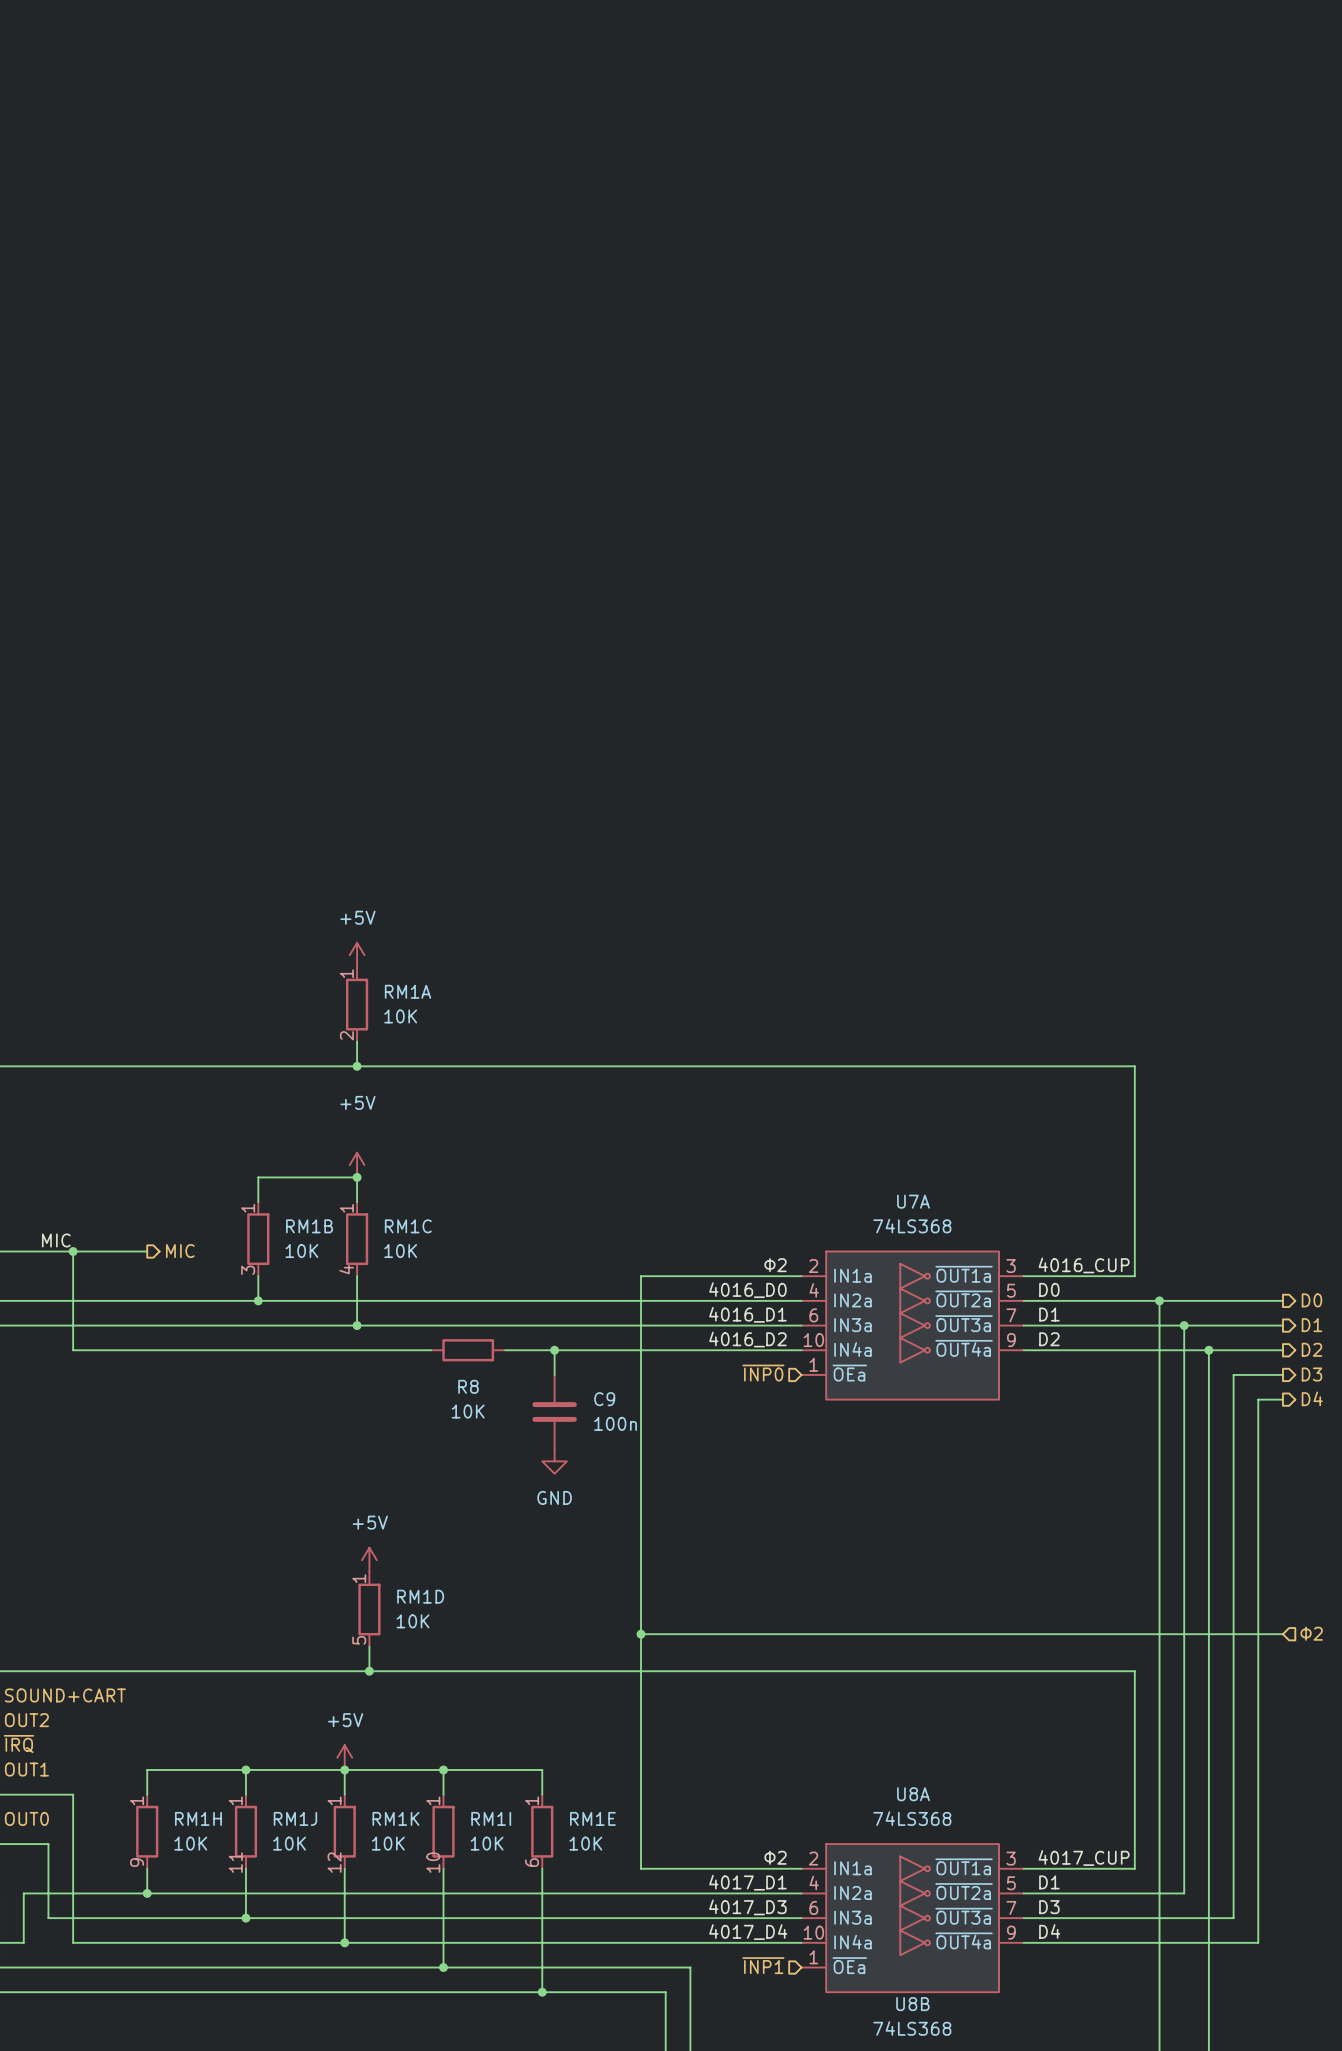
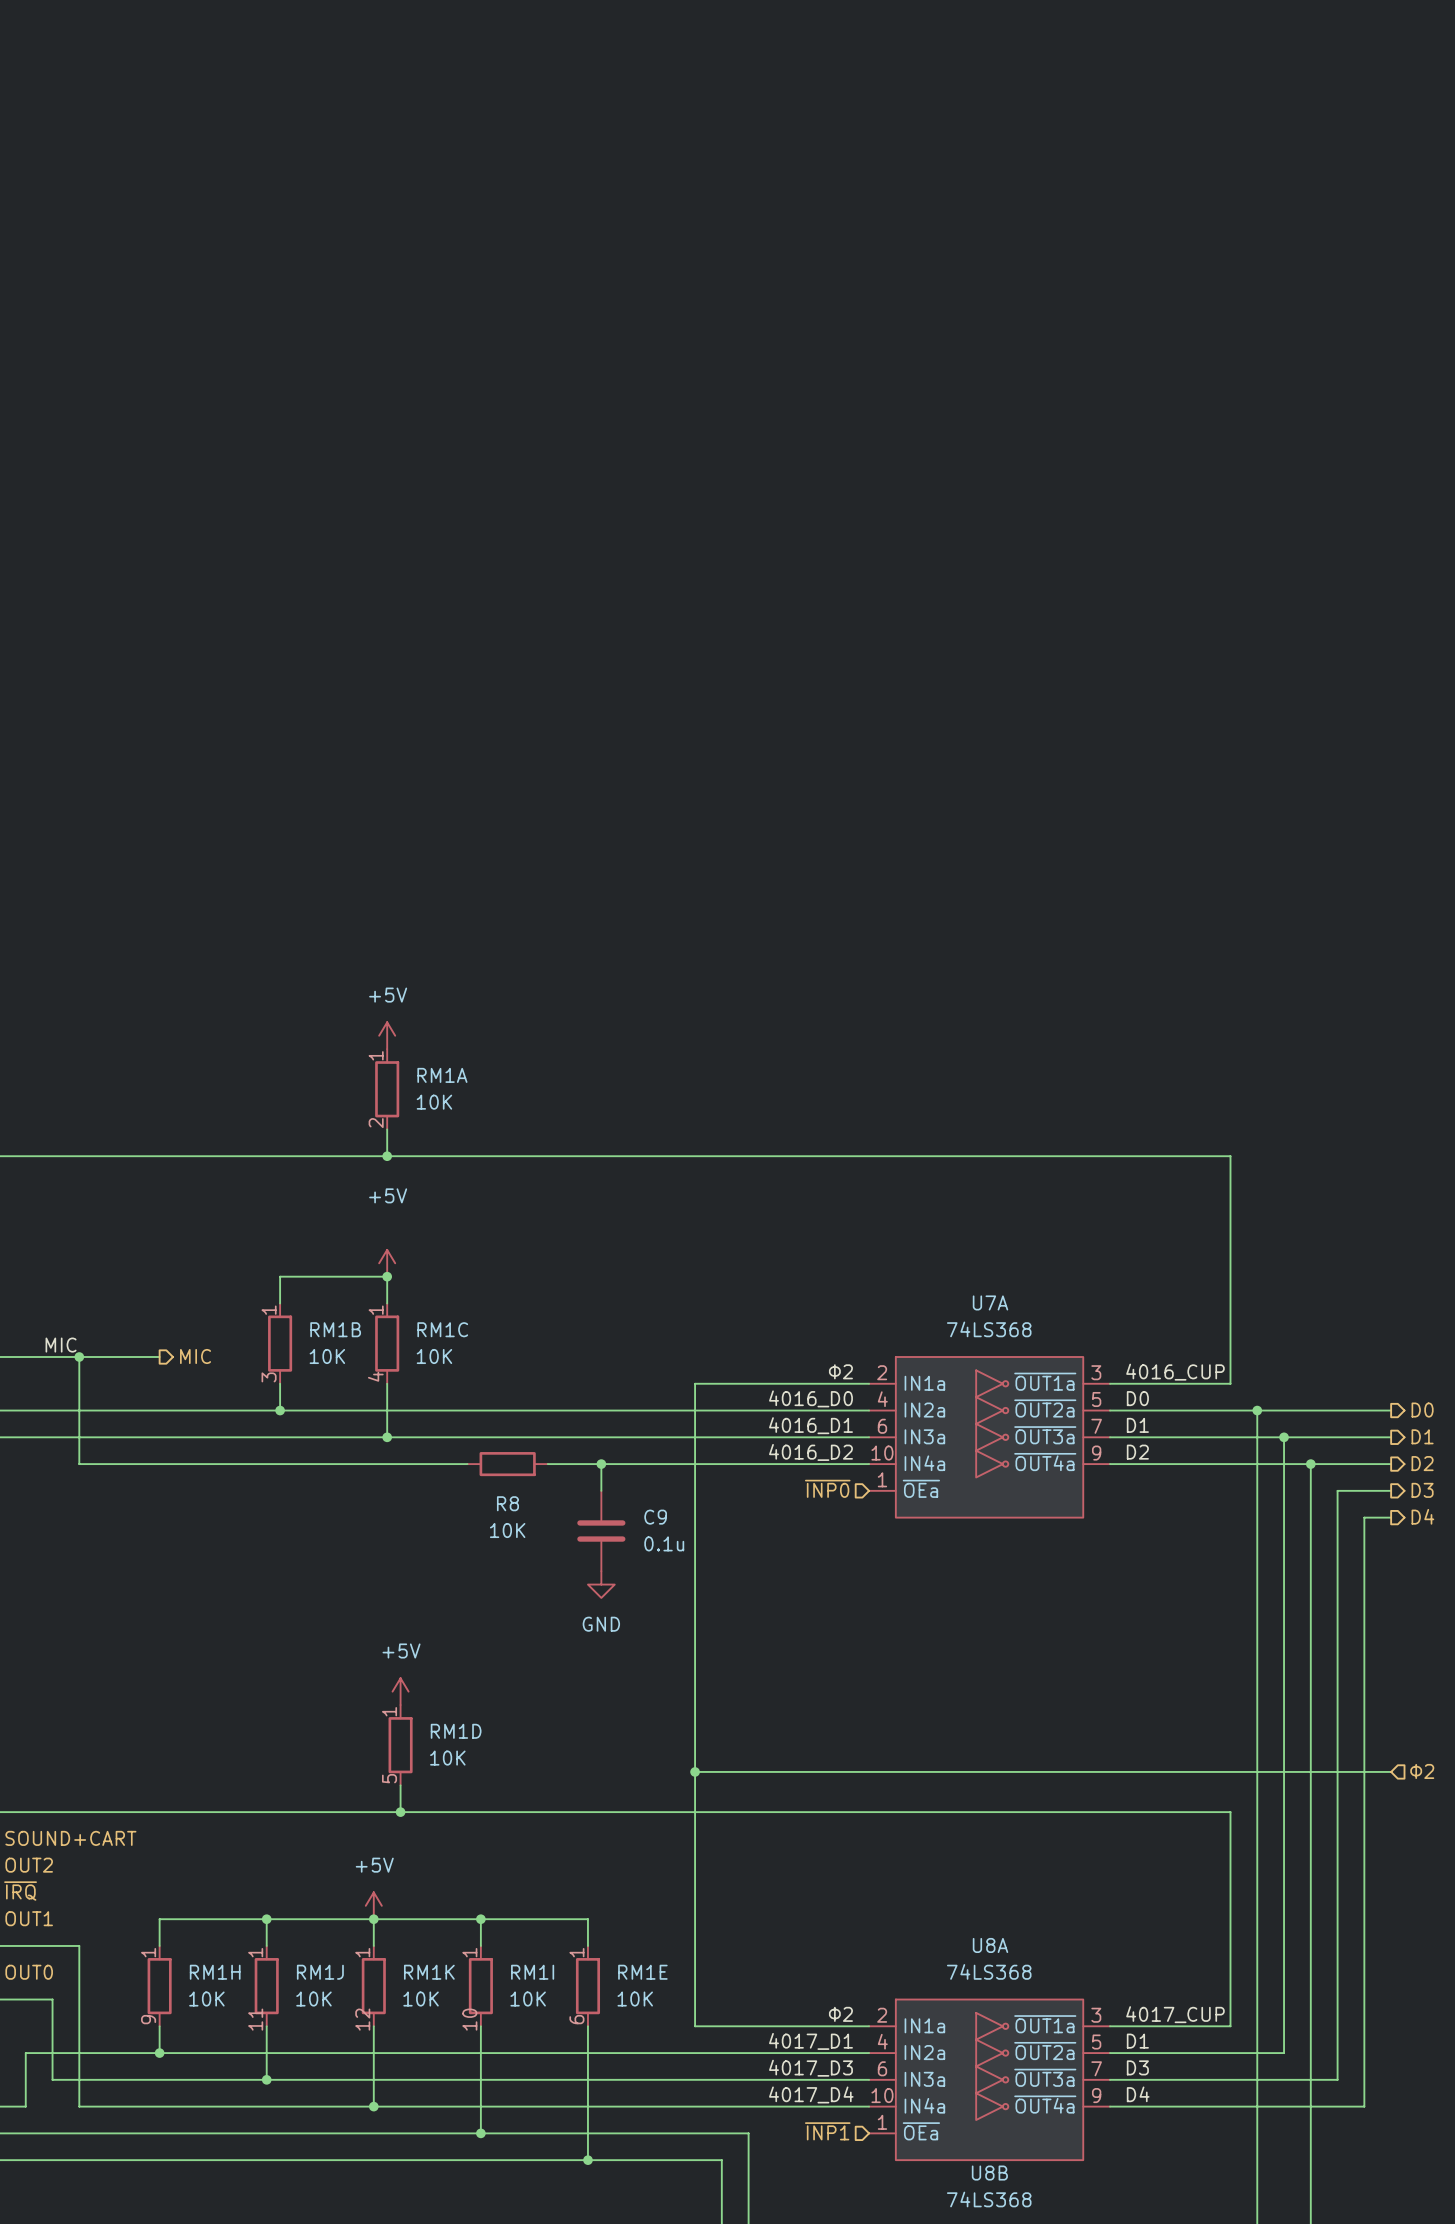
C9 value: 100n (615, 1423) -> 0.1u (664, 1543)

